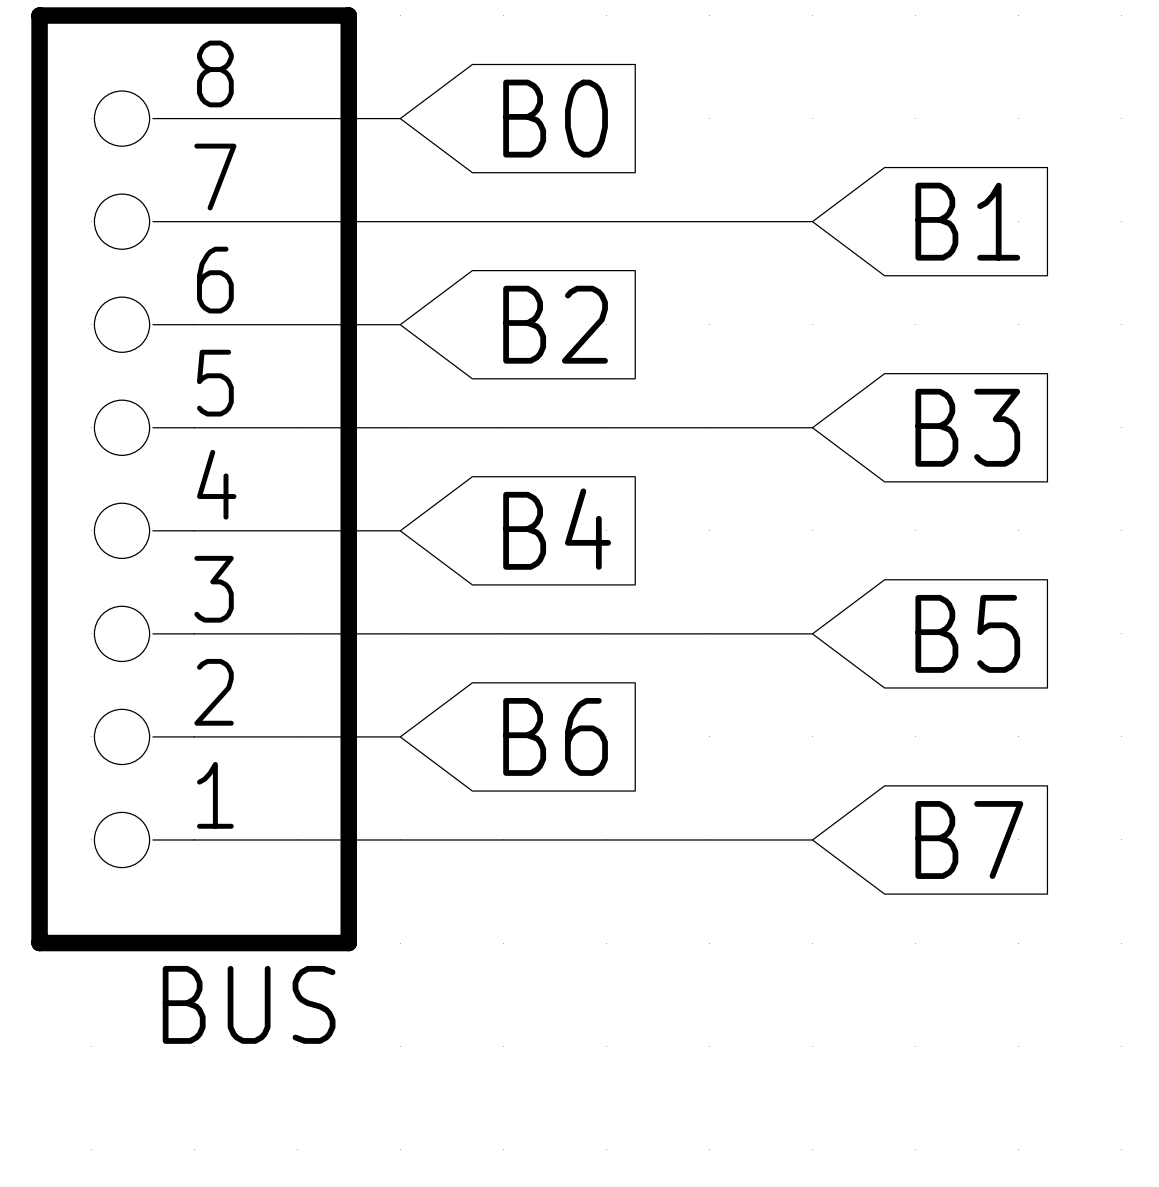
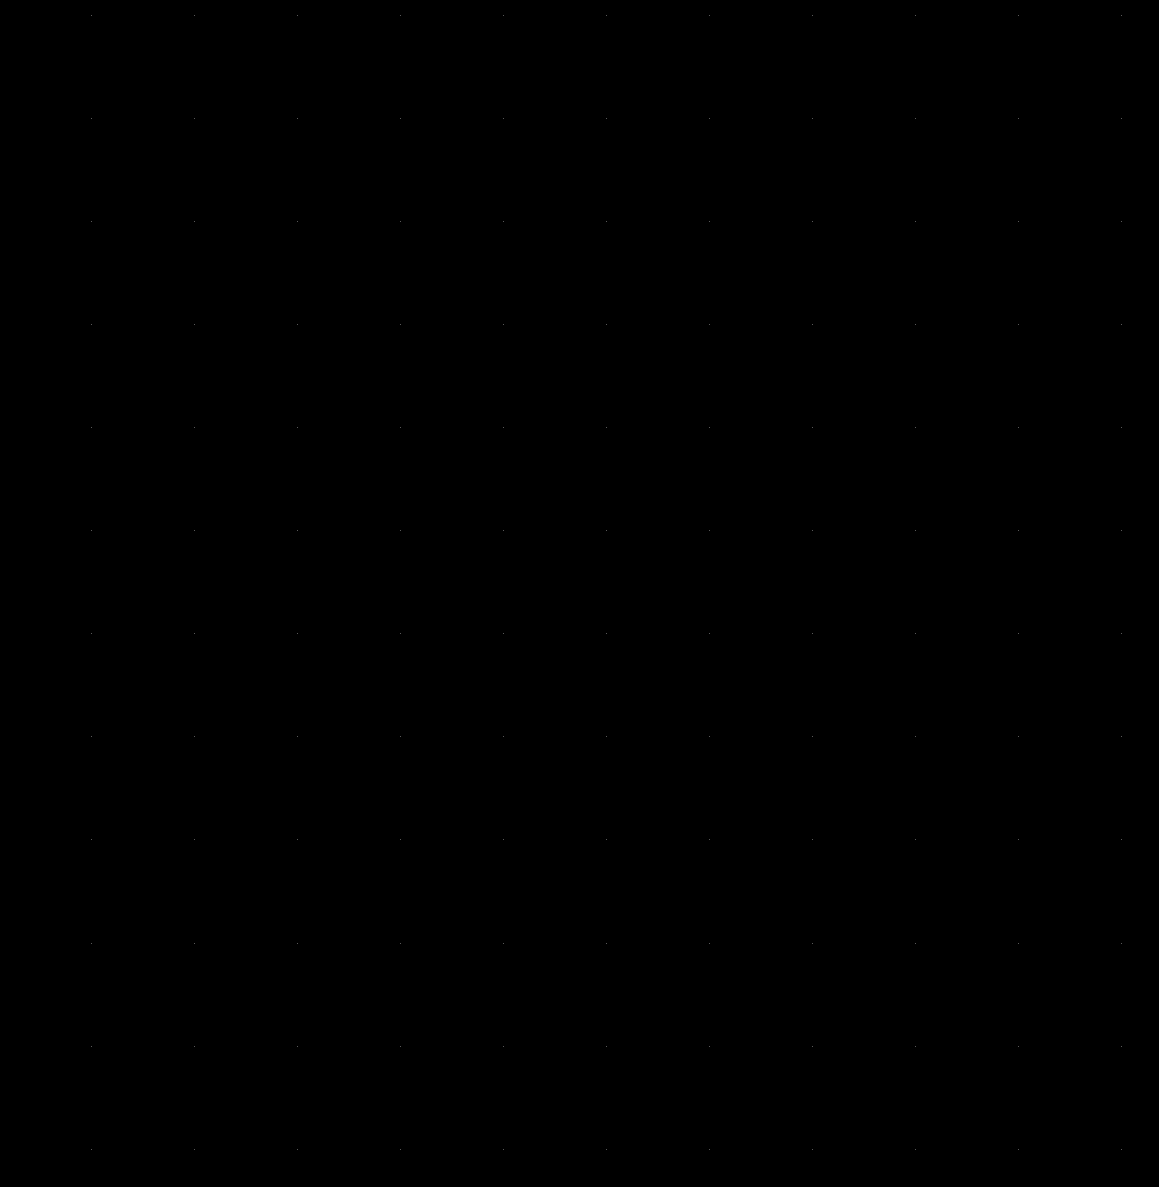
wire: (194, 118) (400, 118) -> none
global label: B0 (555, 118) -> none
wire: (194, 221) (812, 221) -> none
global label: B1 (967, 221) -> none
wire: (194, 324) (400, 324) -> none
global label: B2 (555, 324) -> none
wire: (194, 427) (812, 427) -> none
global label: B3 (967, 427) -> none
BUS: (194, 479) -> none
global label: B4 (557, 529) -> none
wire: (194, 530) (400, 530) -> none
wire: (194, 633) (812, 633) -> none
global label: B5 (967, 633) -> none
wire: (194, 736) (400, 736) -> none
global label: B6 (555, 736) -> none
wire: (194, 839) (812, 839) -> none
global label: B7 (969, 839) -> none

